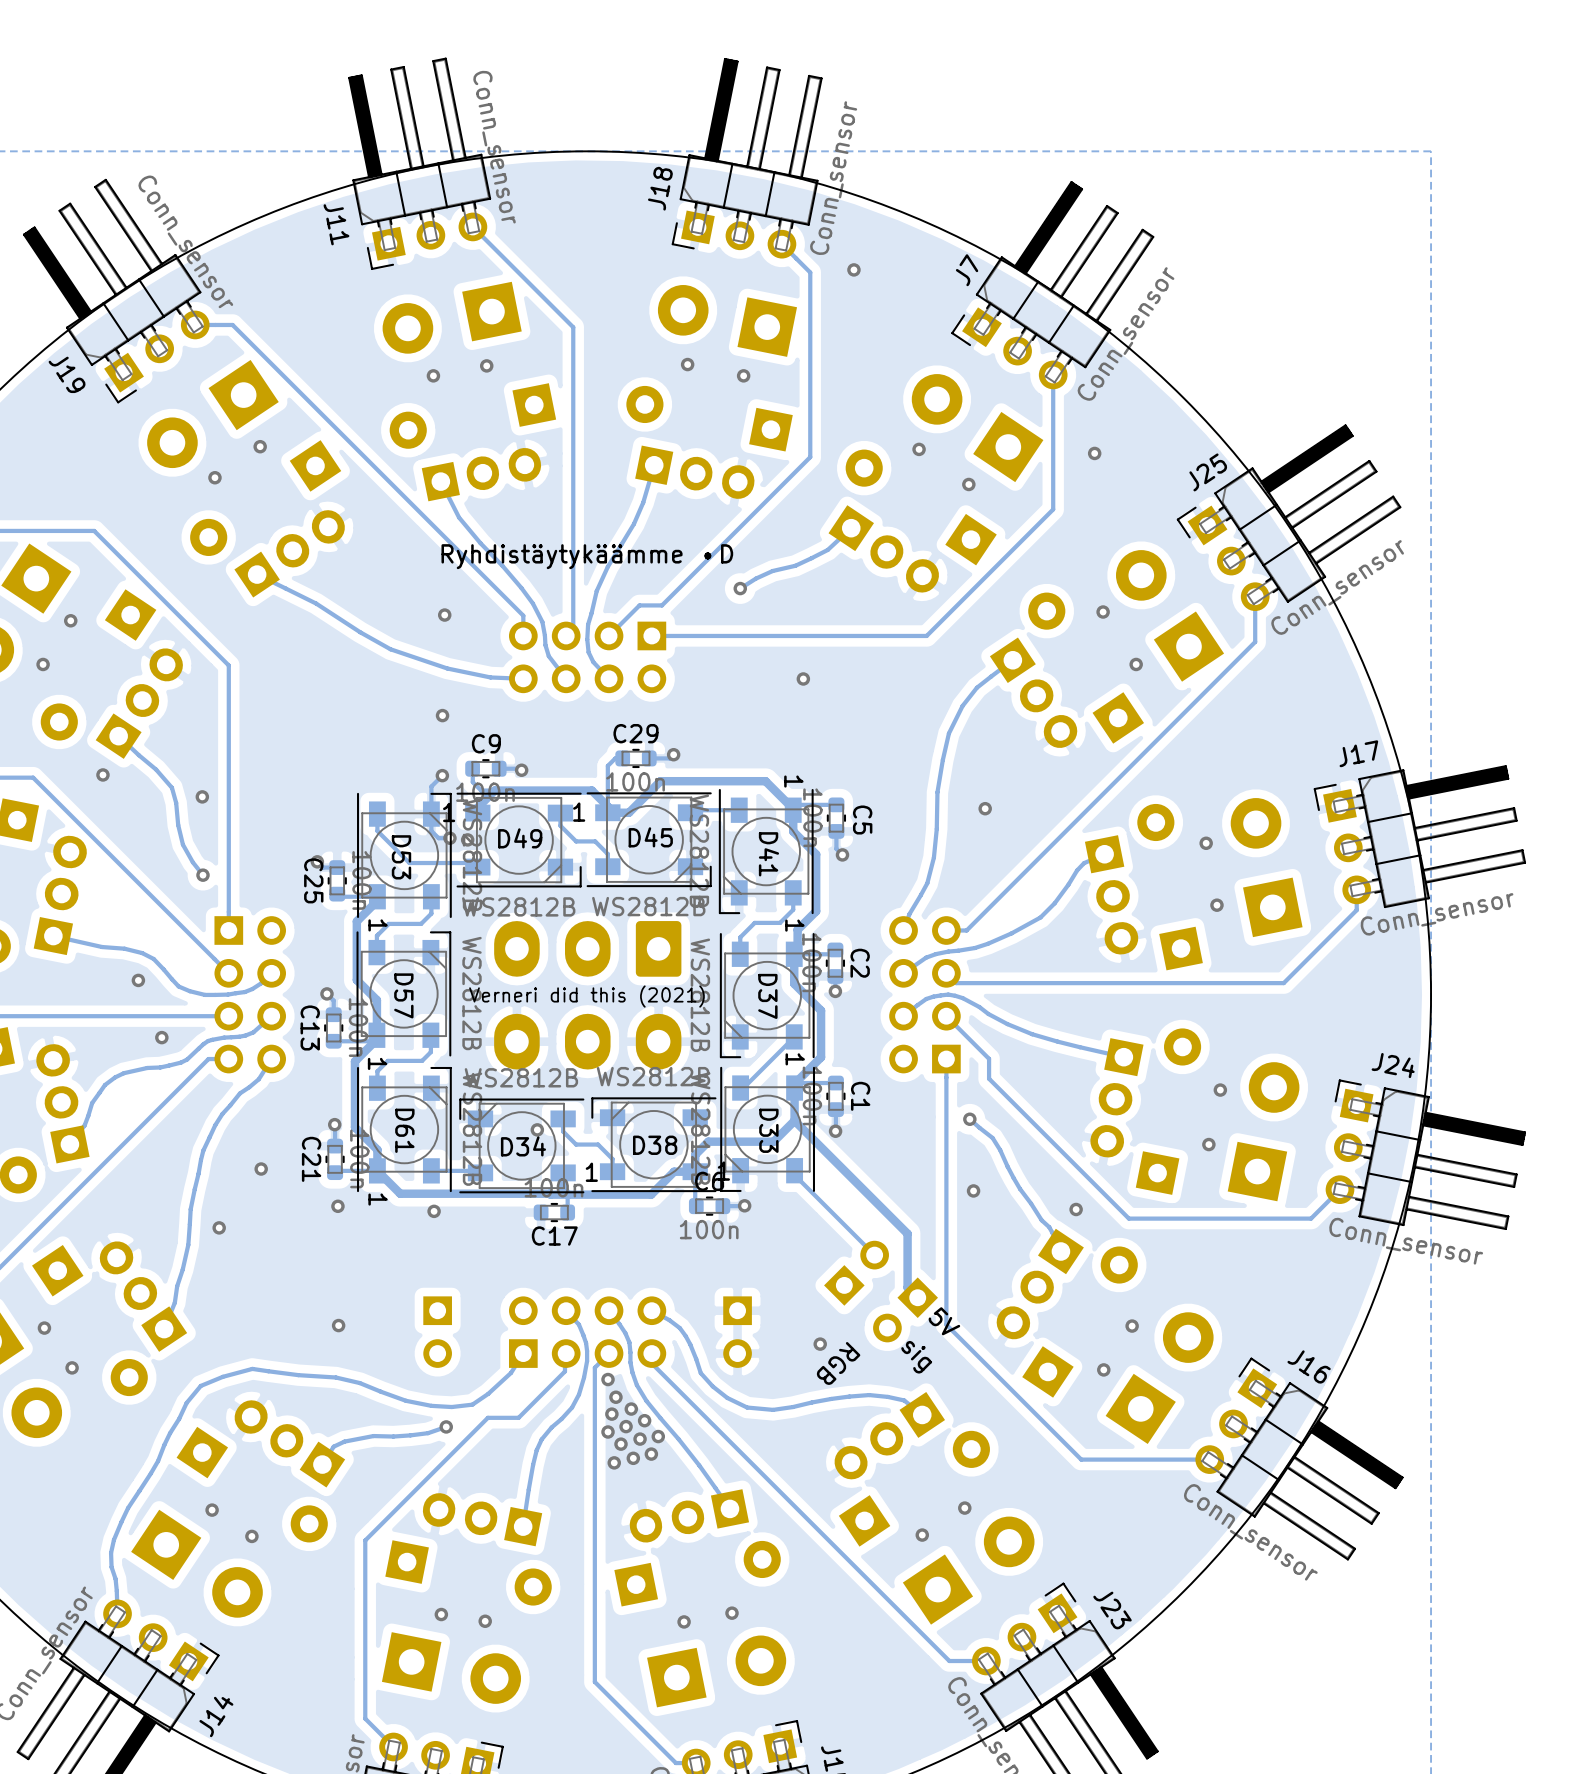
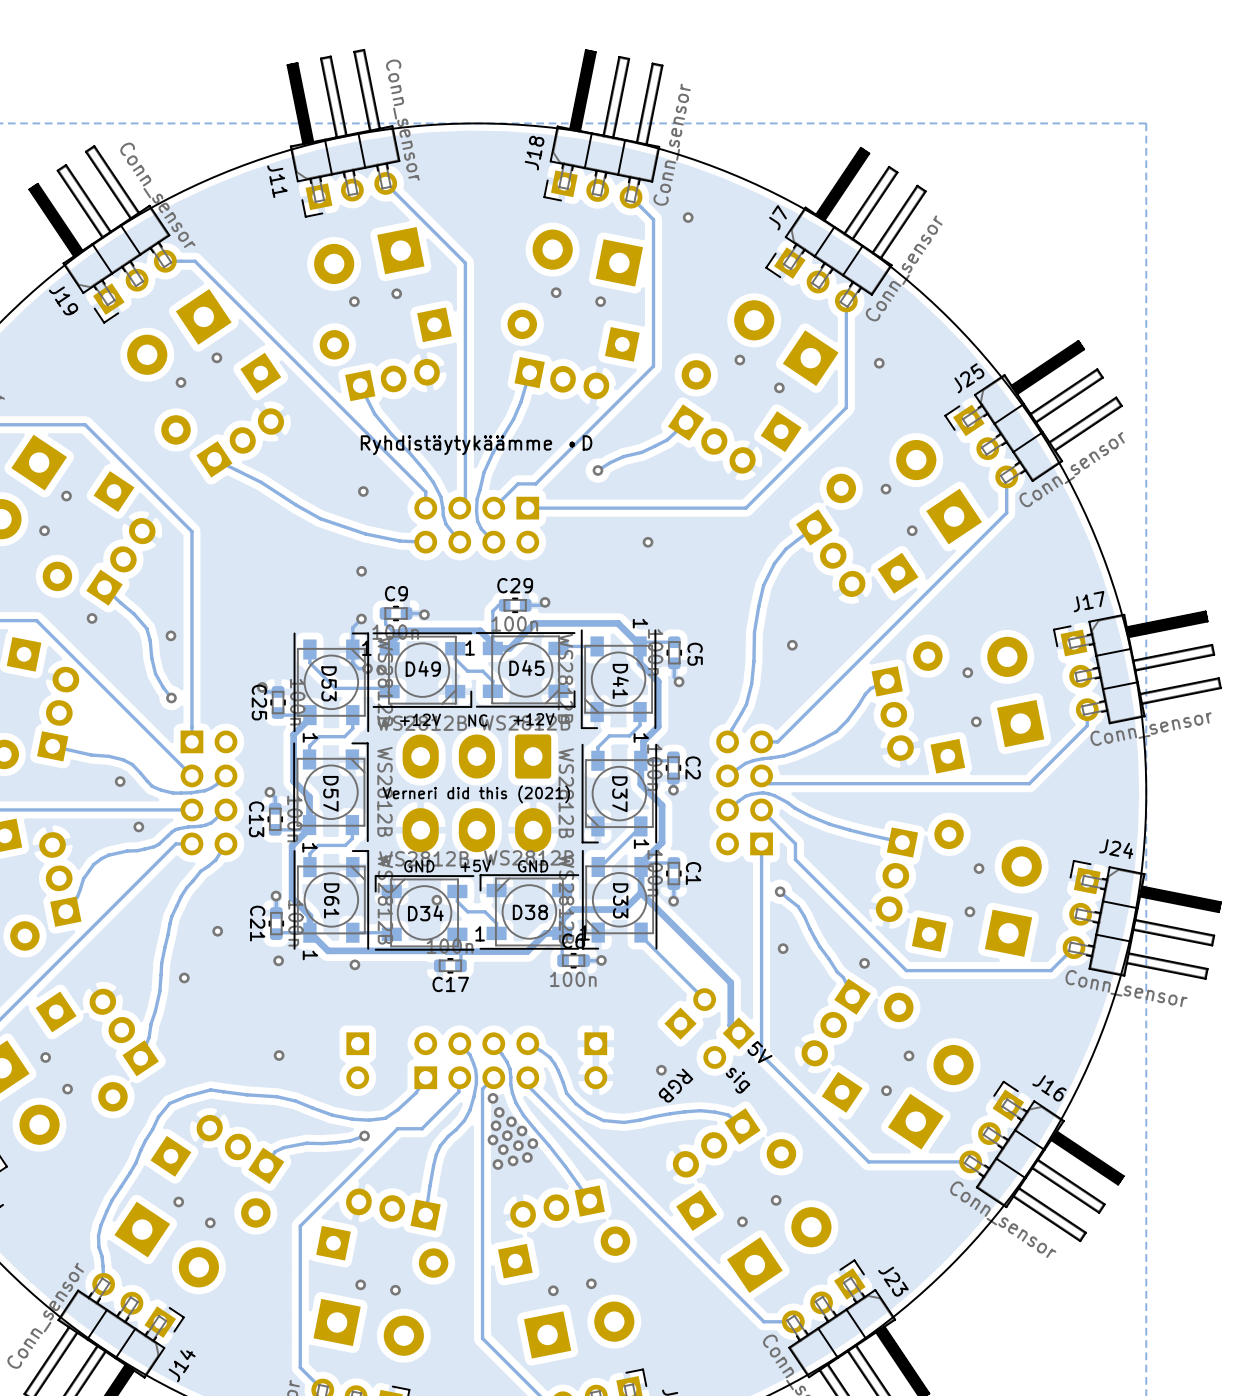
text: none -> +12V (533, 719)
text: none -> +12V (420, 719)
text: none -> NC (477, 720)
text: none -> +5V (475, 865)
text: none -> GND (419, 866)
text: none -> GND (533, 866)

